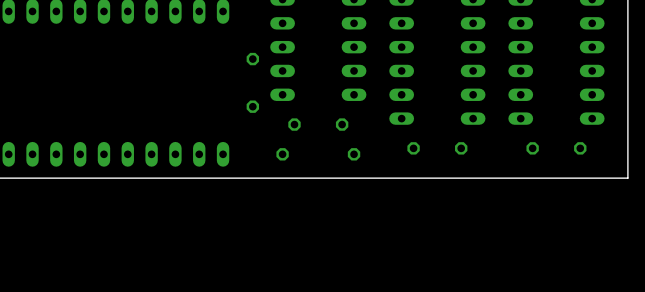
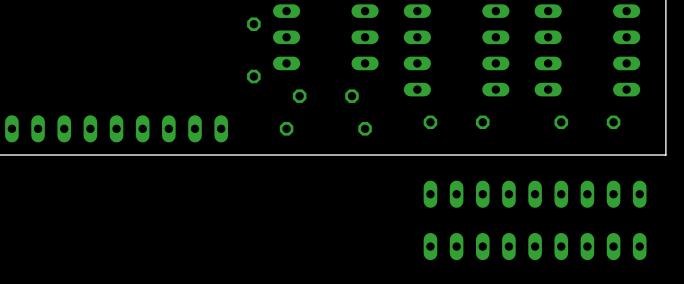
part: none -> (535, 194)
part: none -> (535, 246)

